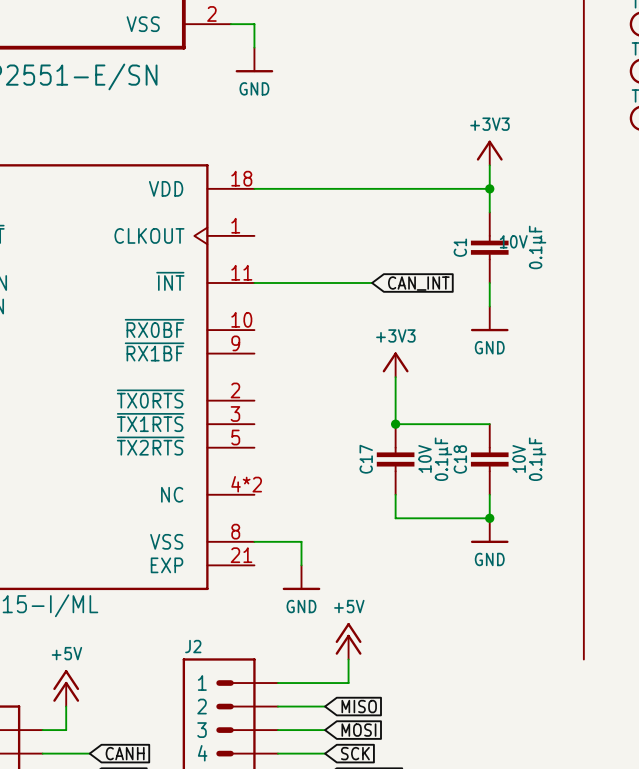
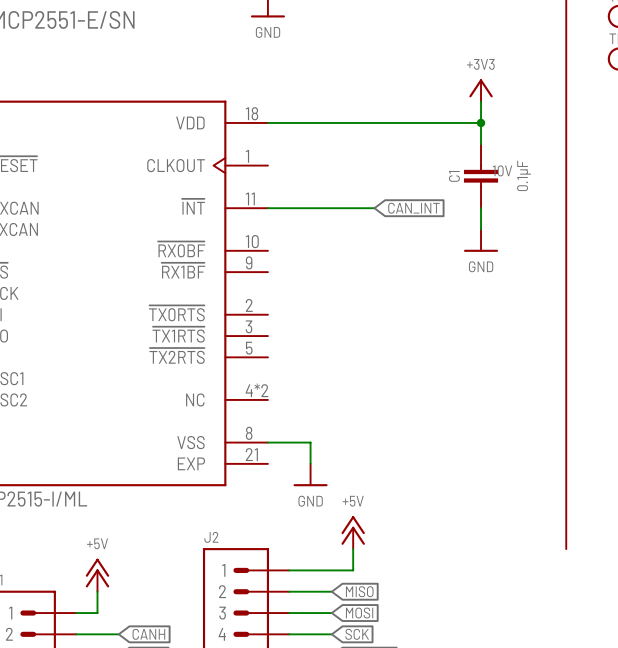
power symbol: +3V3 (395, 364) -> none
wire: (395, 377) (395, 424) (489, 424) -> none
junction: (395, 424) -> none
C17: (395, 459) -> none
C18: (489, 459) -> none
wire: (395, 494) (395, 518) (489, 518) (489, 494) -> none
junction: (489, 518) -> none
power symbol: GND (489, 530) -> none

